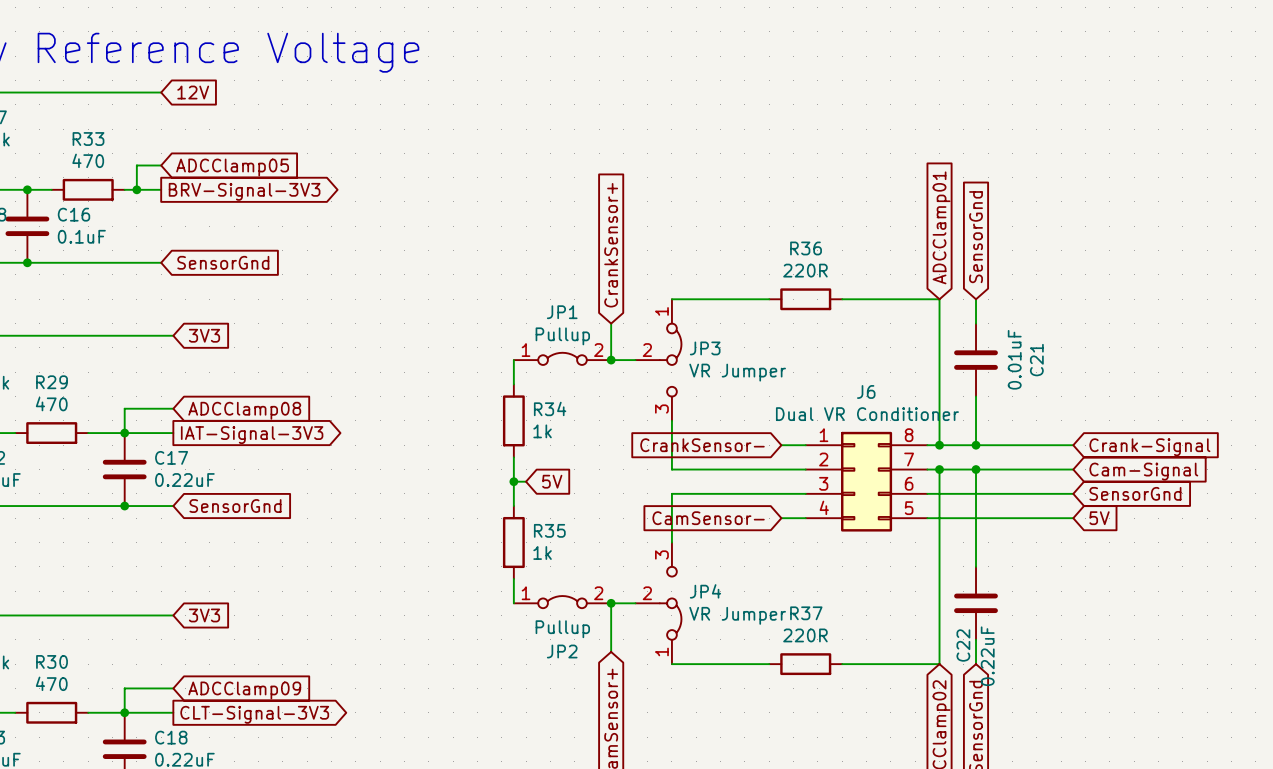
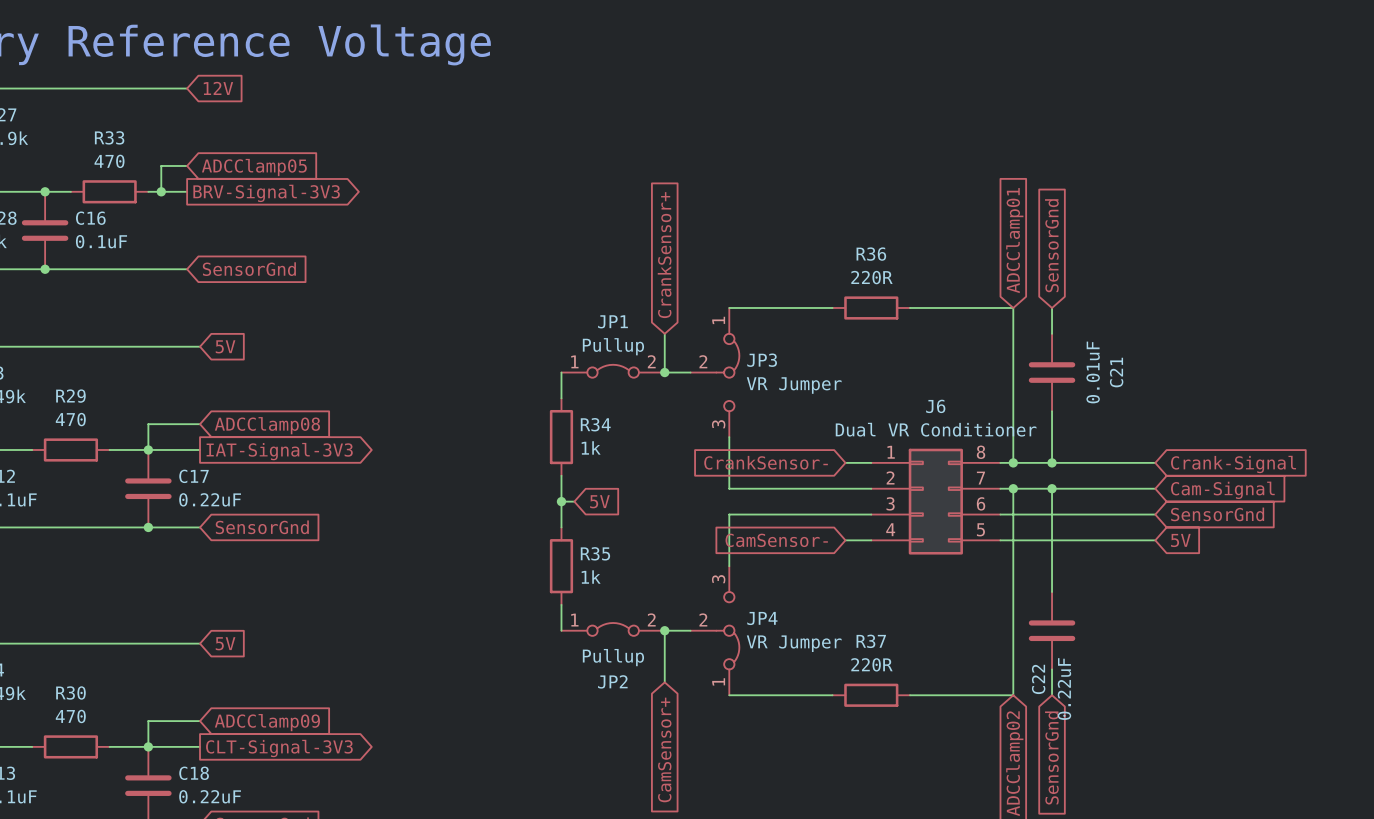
global label: 3V3 (204, 335) -> 5V (225, 346)
global label: 3V3 (204, 615) -> 5V (225, 643)

